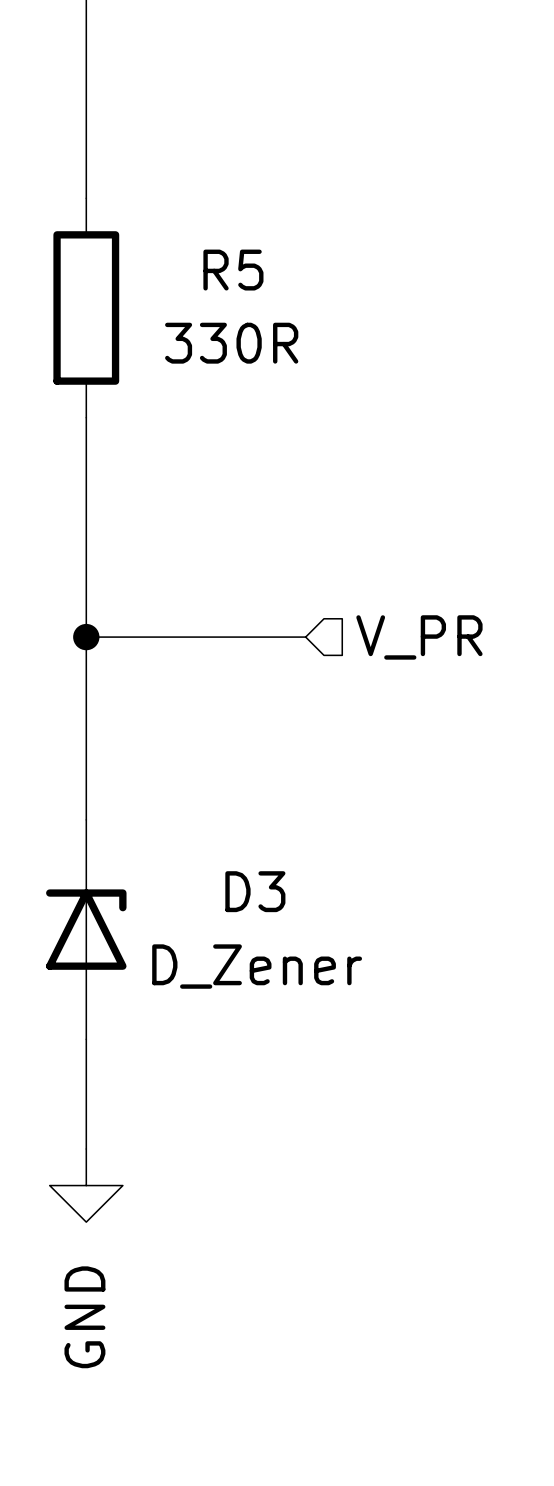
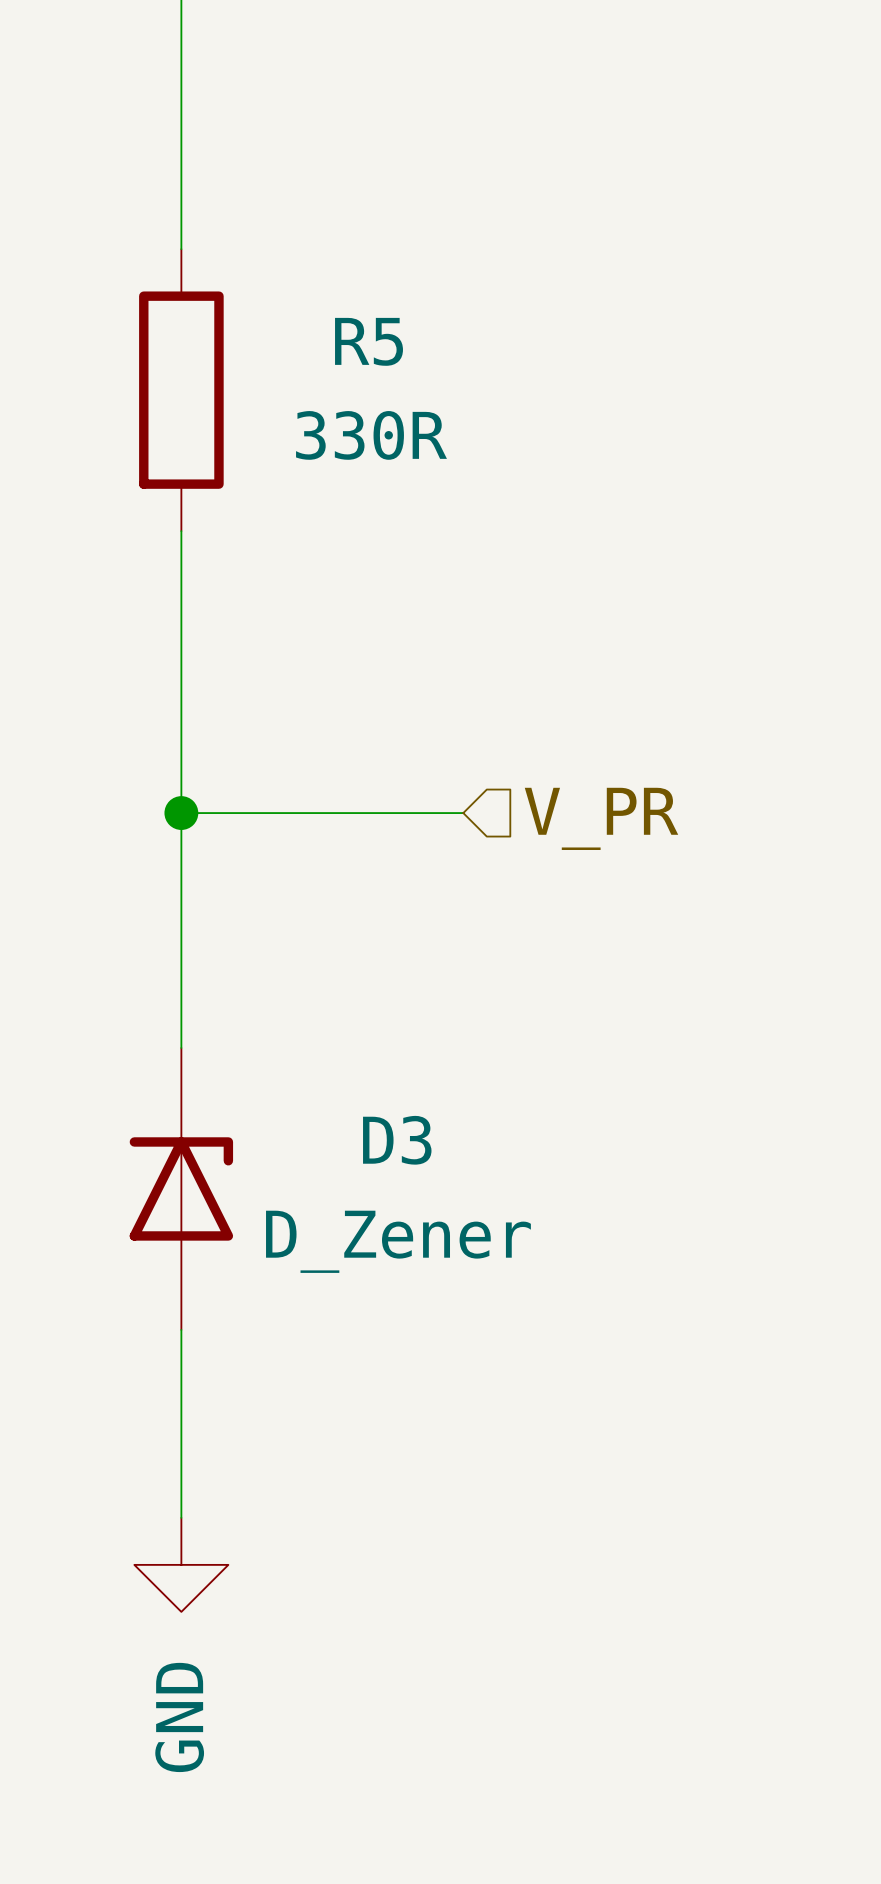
power symbol position: GND (86, 1185) -> GND (181, 1564)

